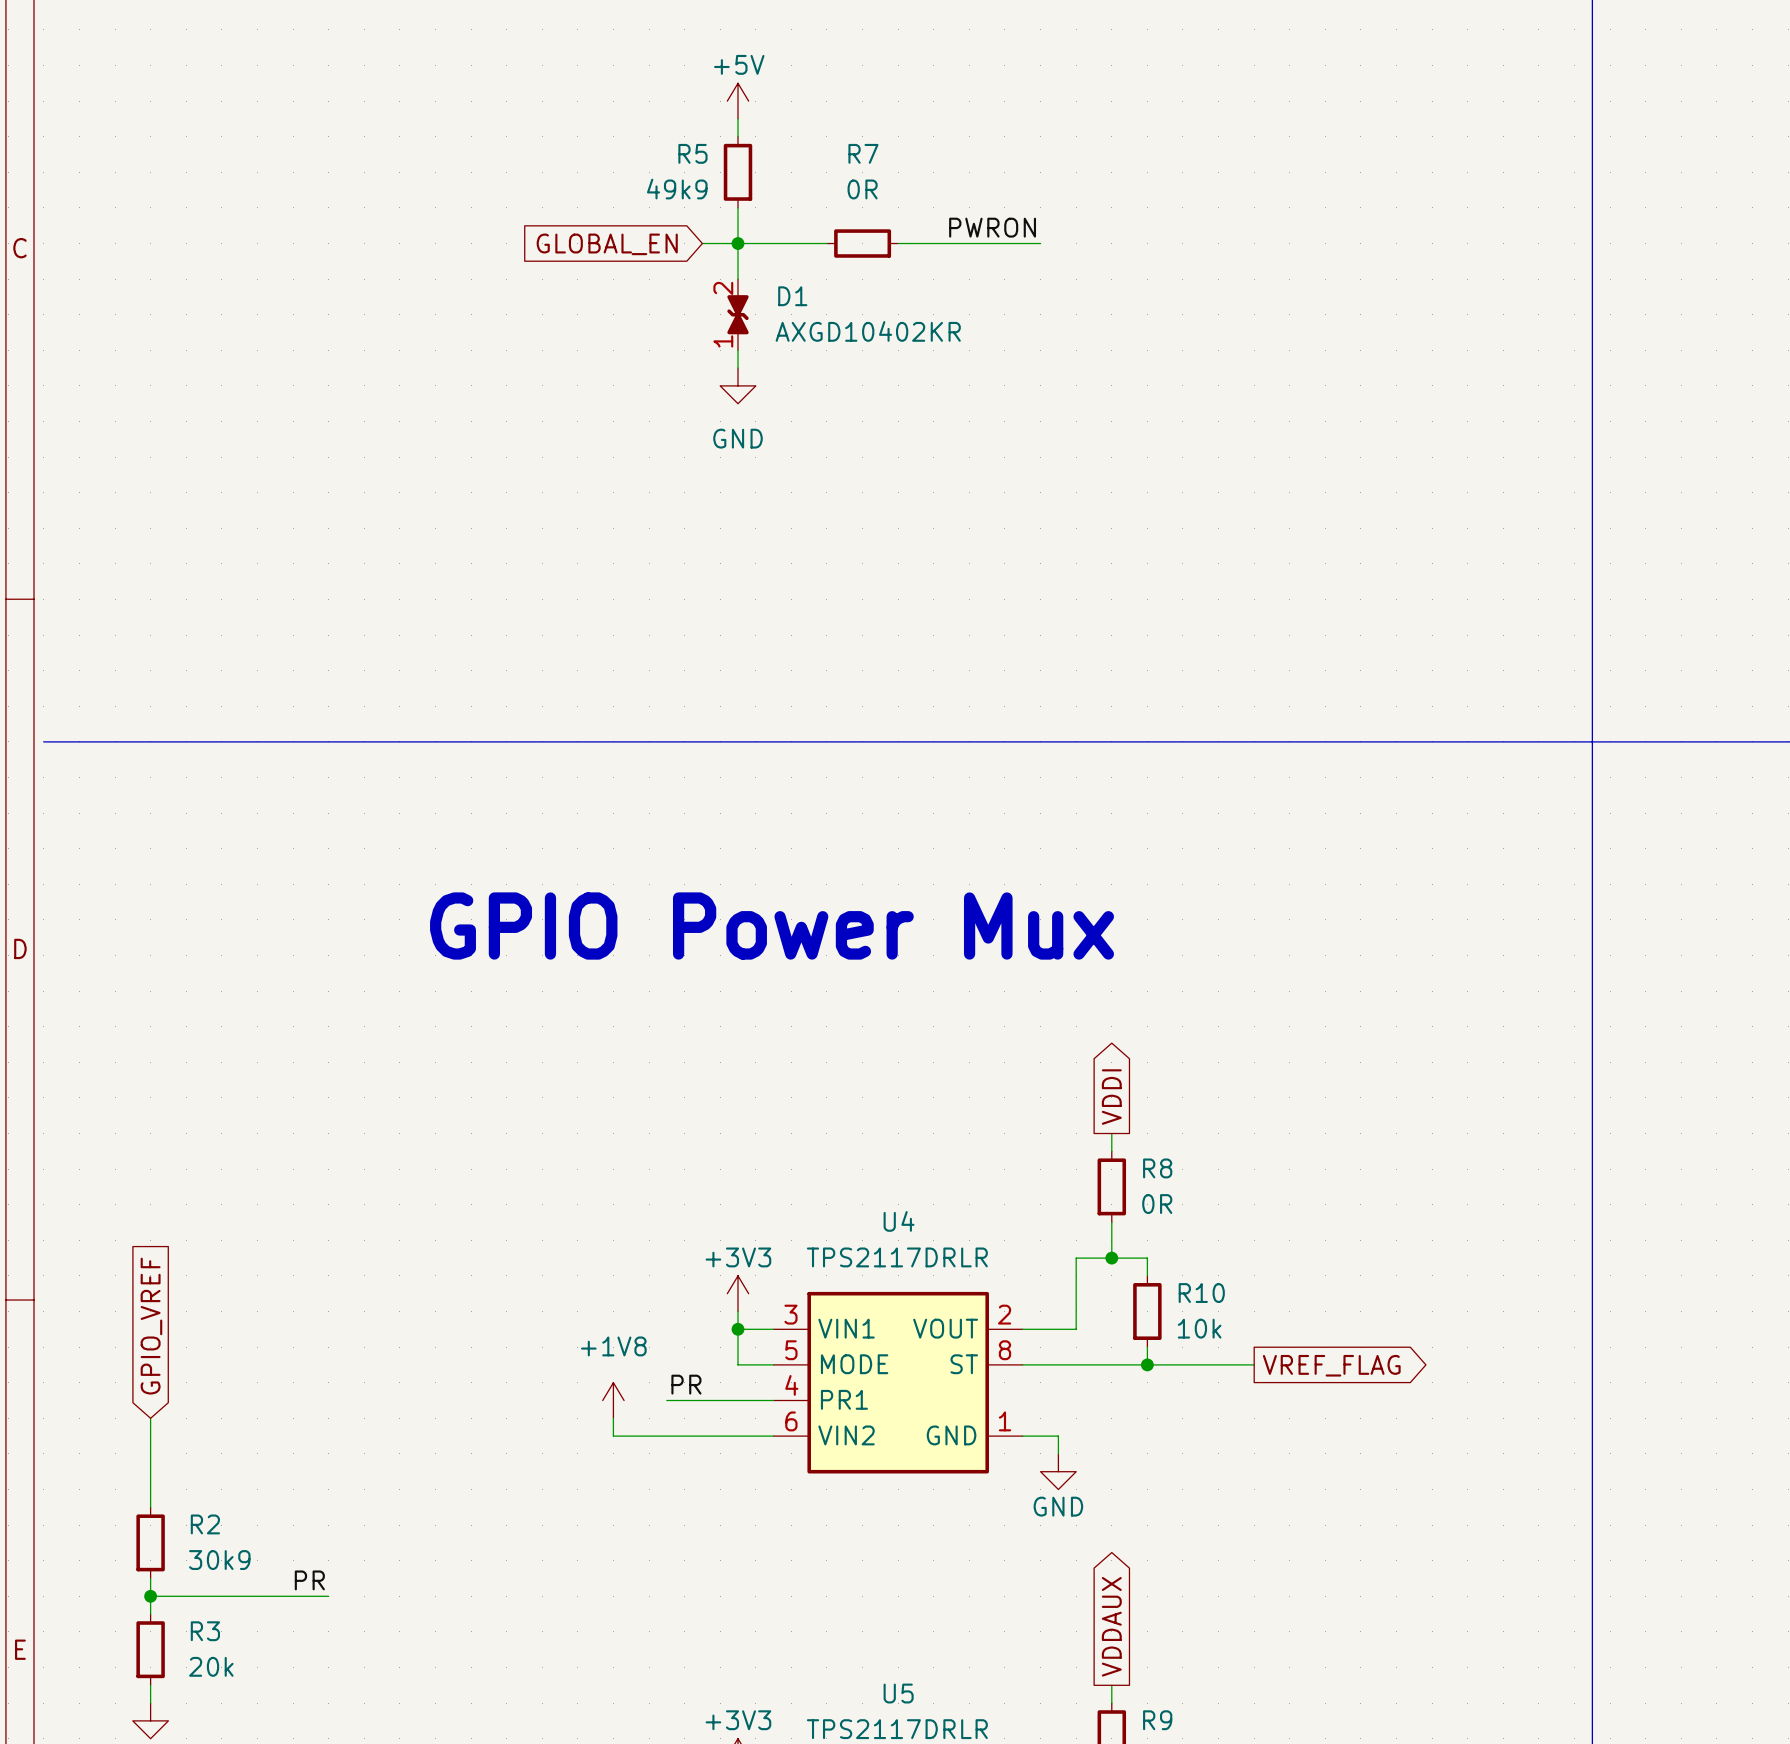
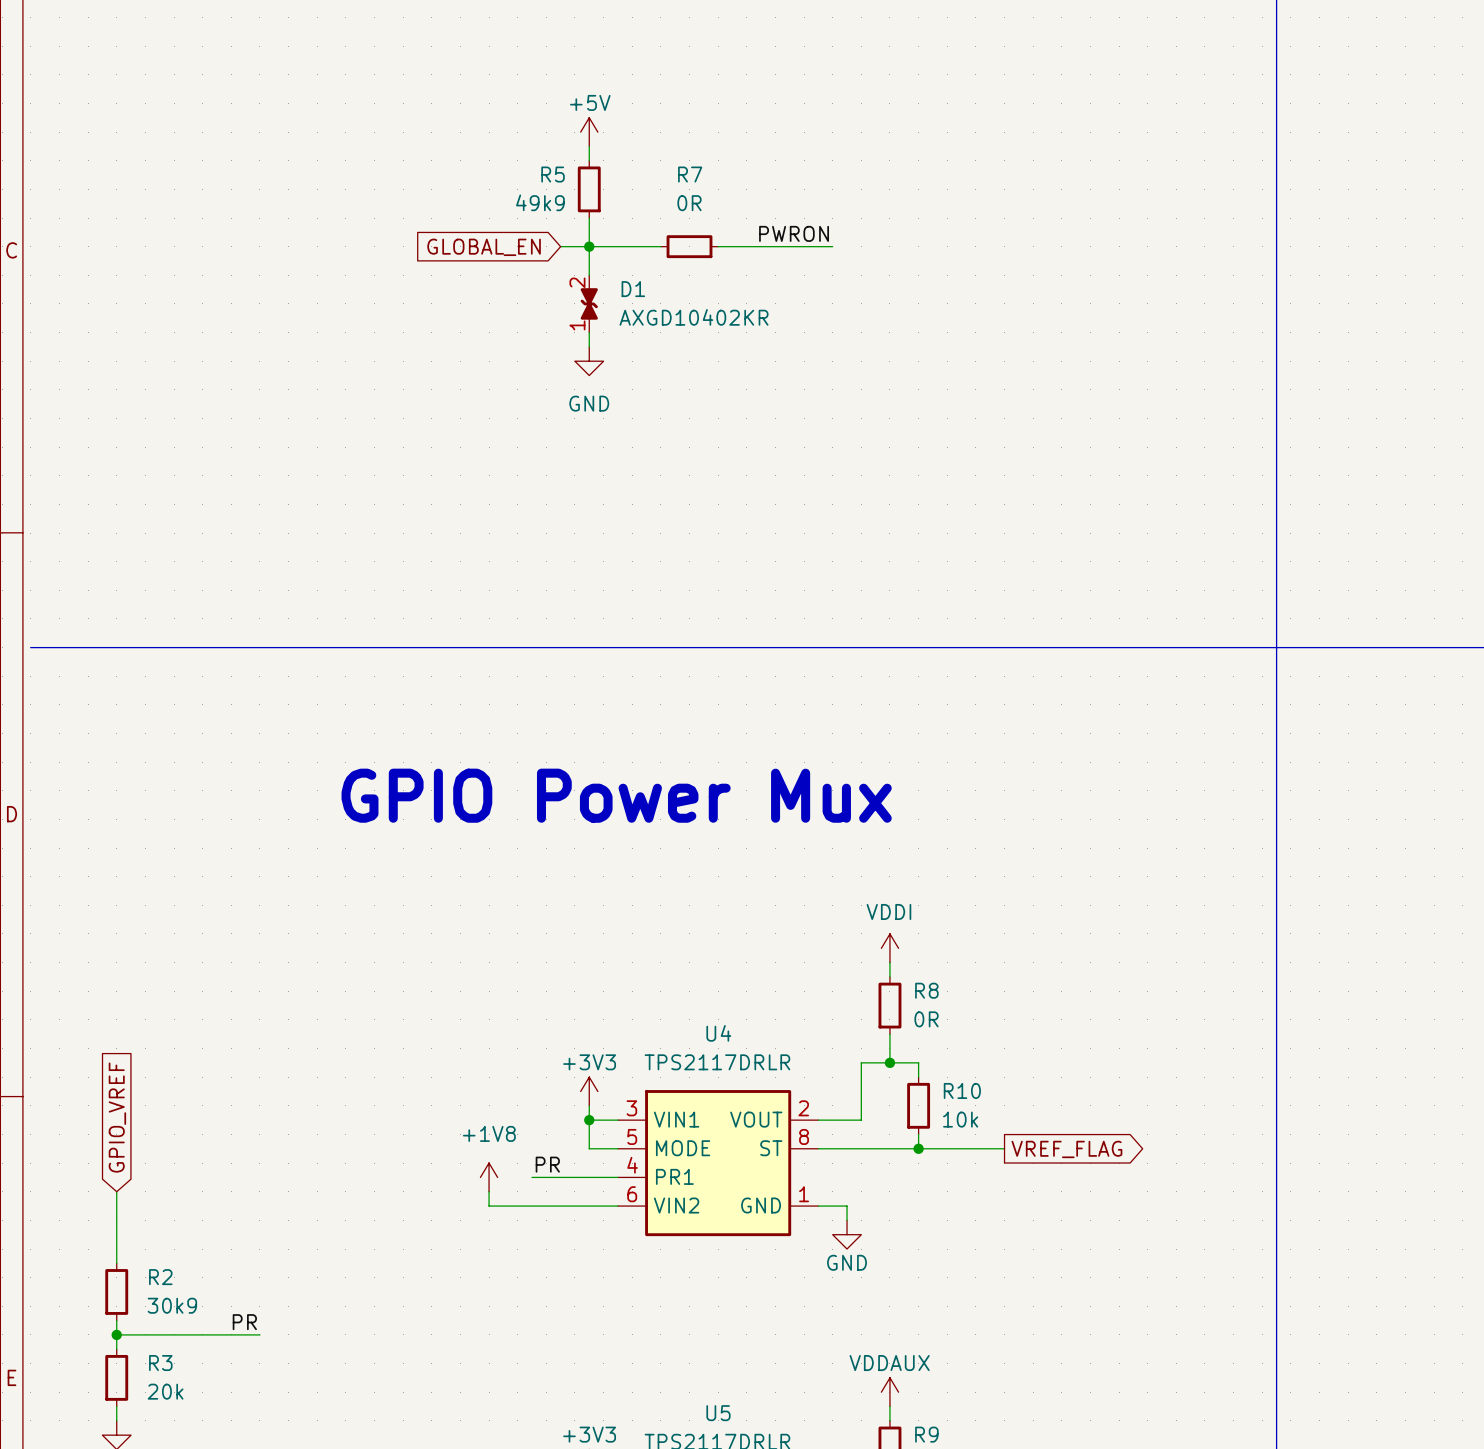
global label: VDDI (1111, 1097) -> none
power symbol: none -> VDDI (889, 948)
global label: VDDAUX (1111, 1626) -> none
power symbol: none -> VDDAUX (889, 1392)

